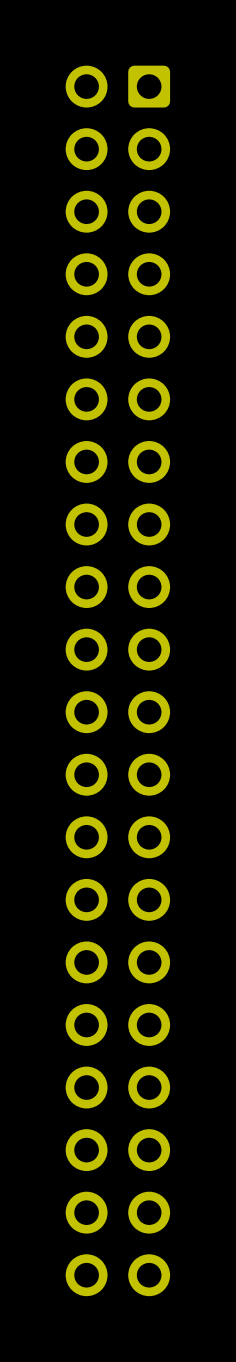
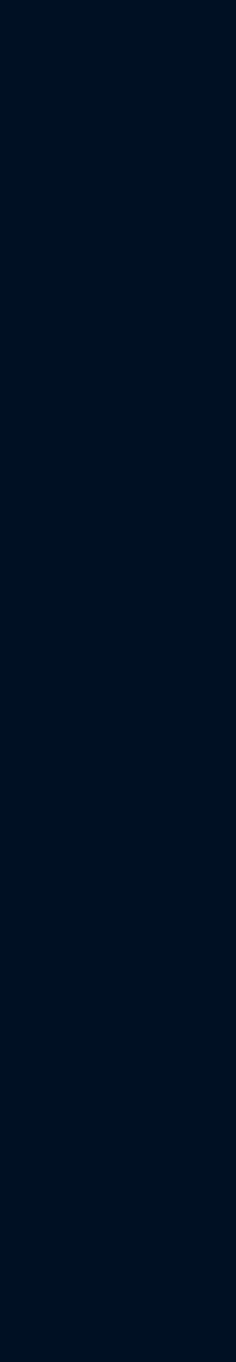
part: (117, 680) -> none

